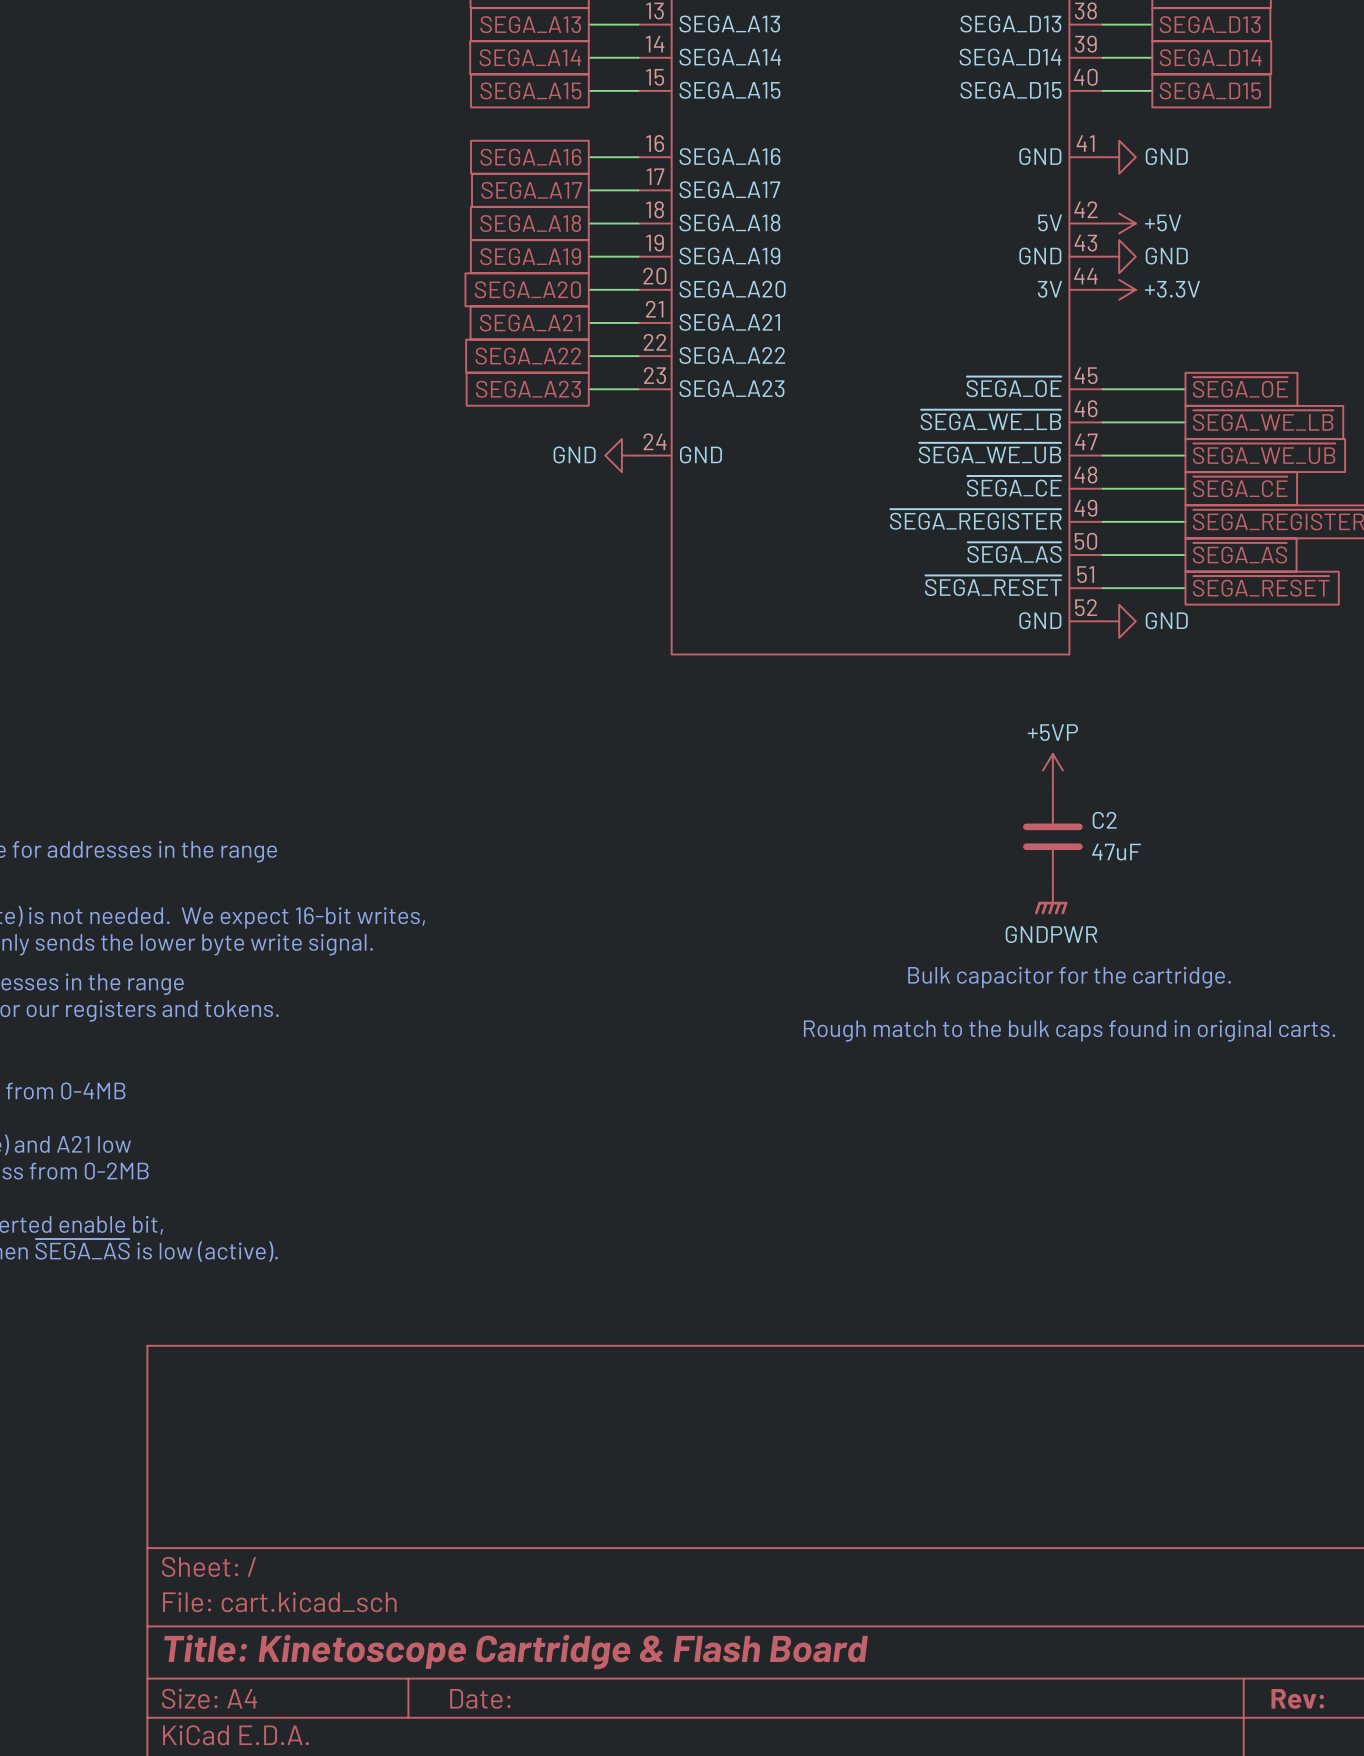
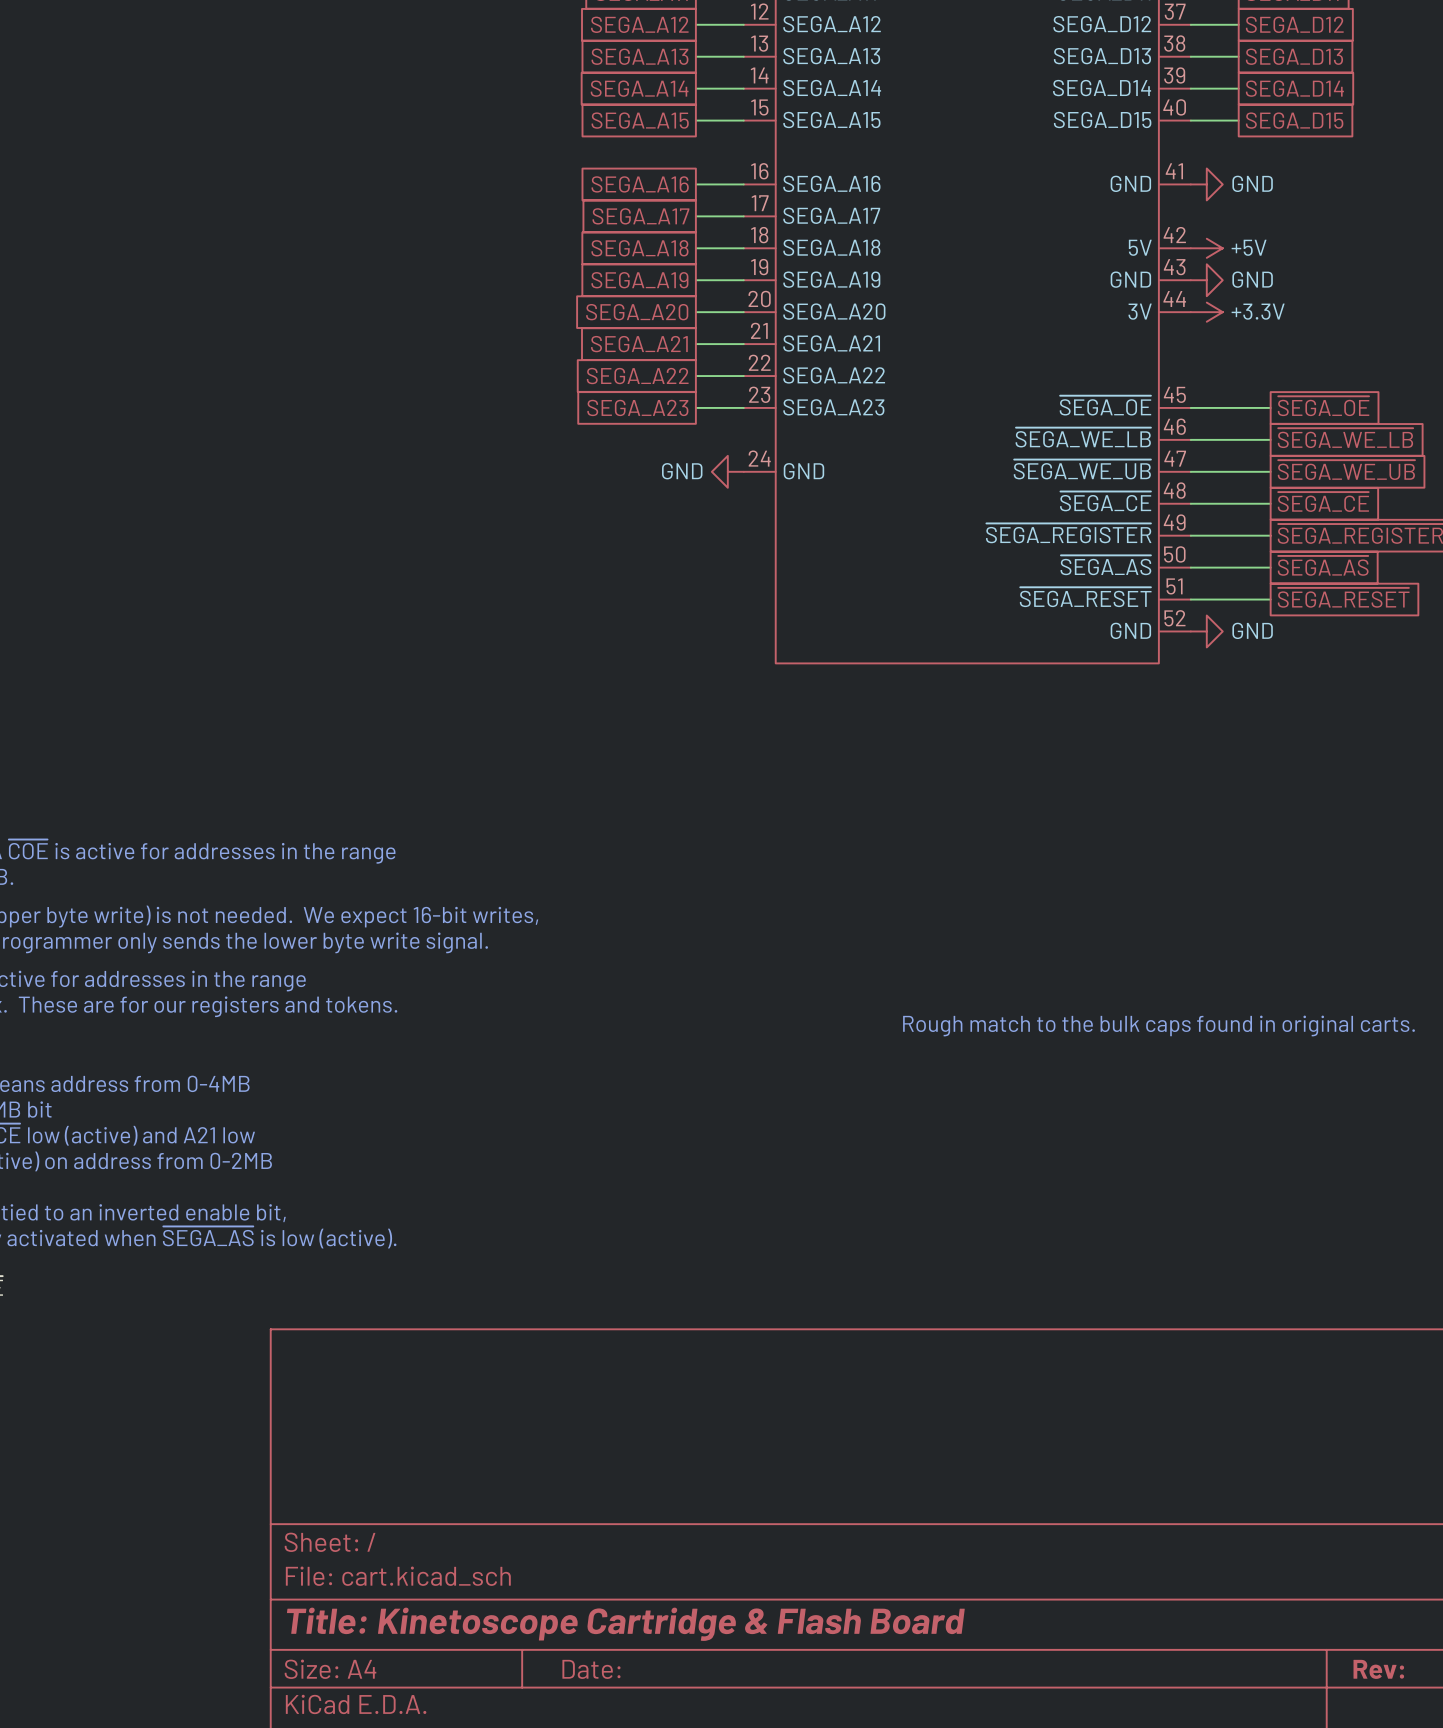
power symbol: +5VP (1052, 770) -> none
C2: 47uF (1052, 836) -> none
power symbol: GNDPWR (1051, 900) -> none
text: Bulk capacitor for the cartridge. (1069, 977) -> none

